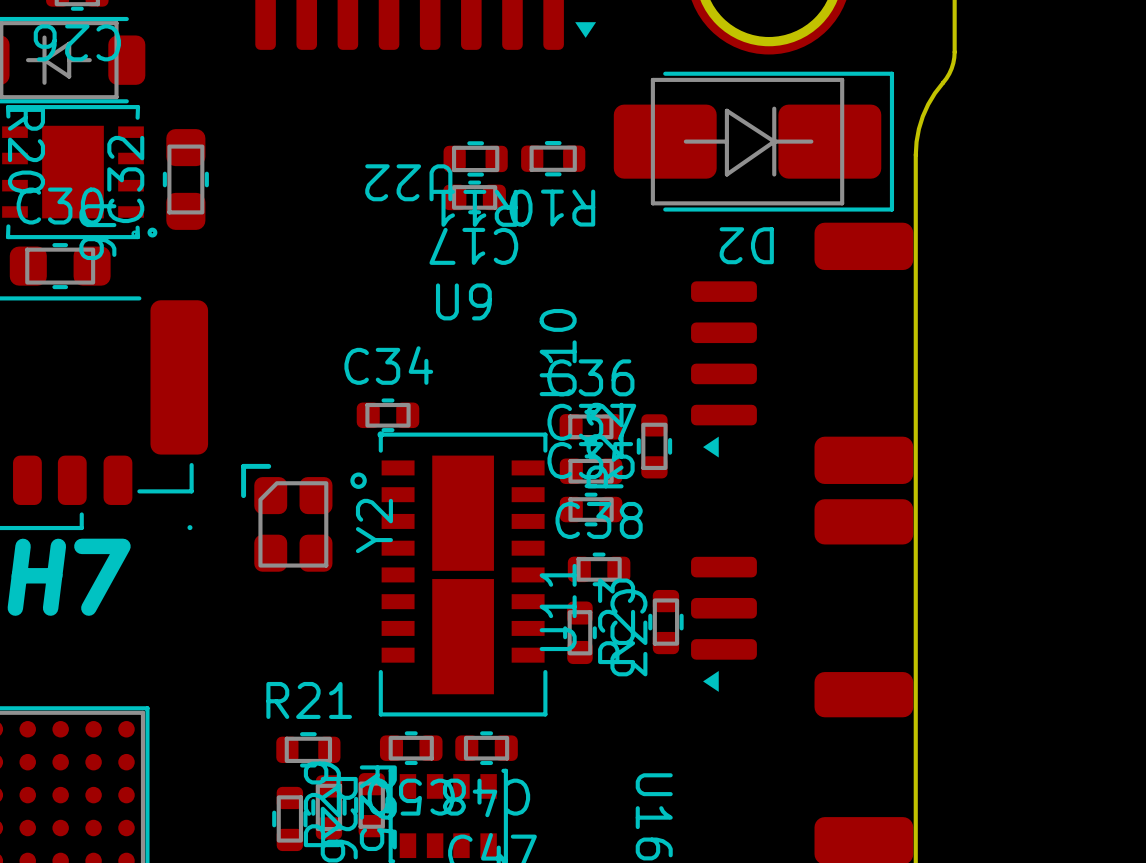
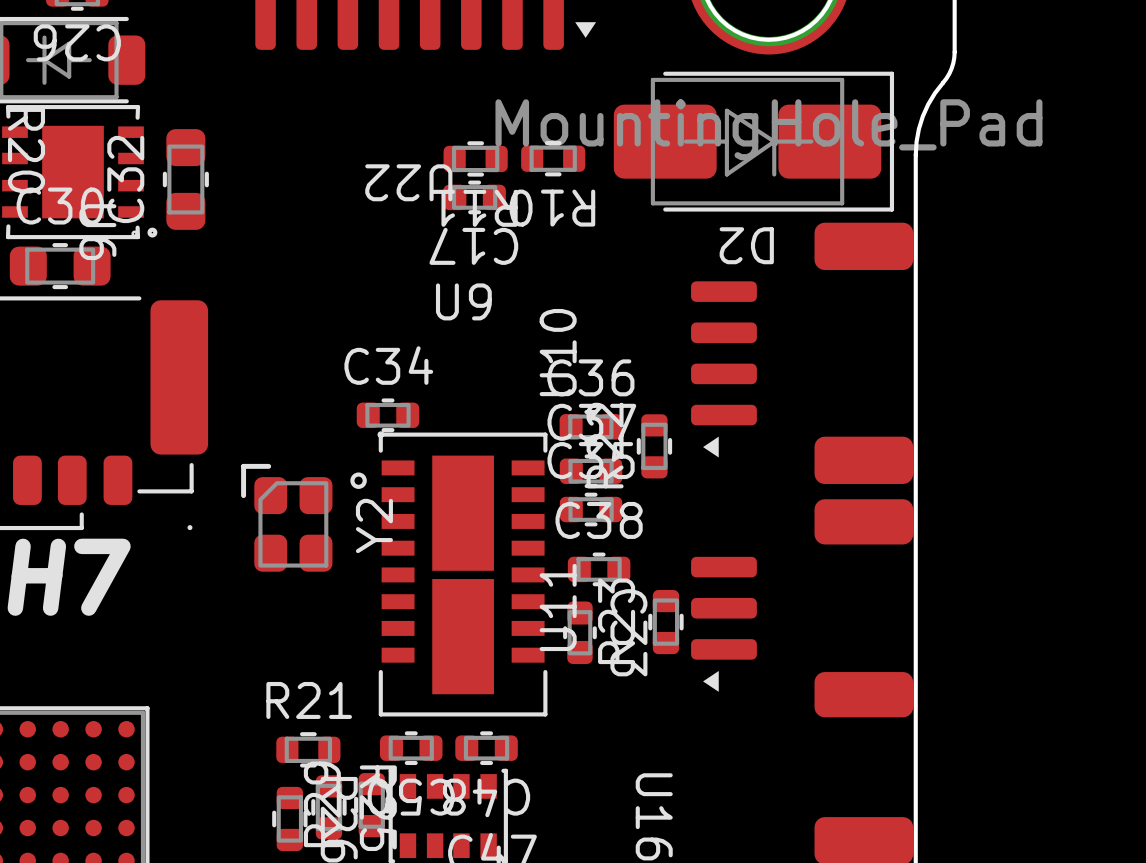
part value: none -> MountingHole_Pad (768, 129)

